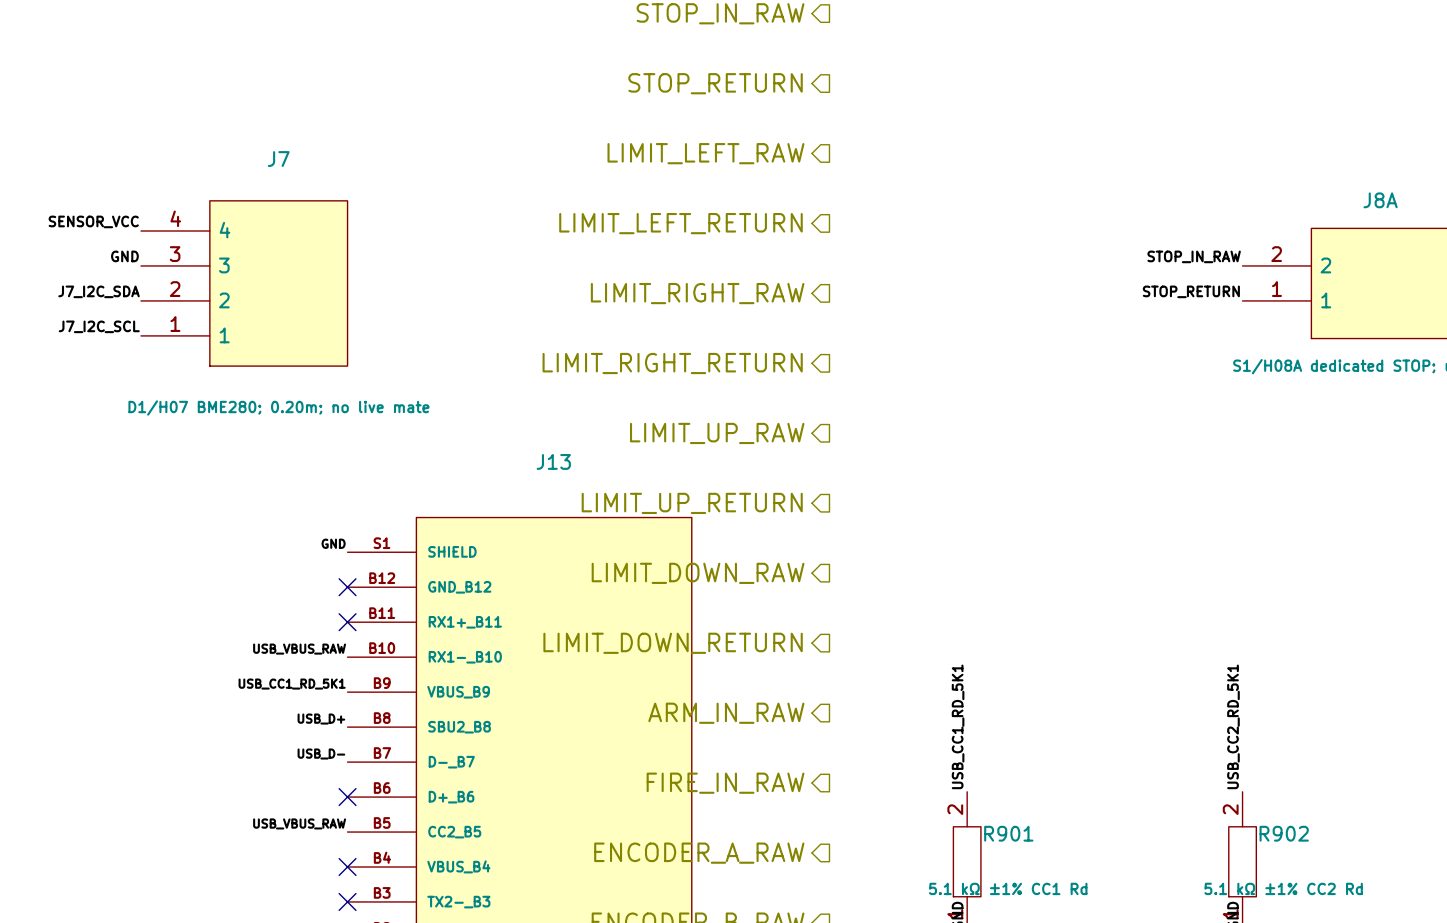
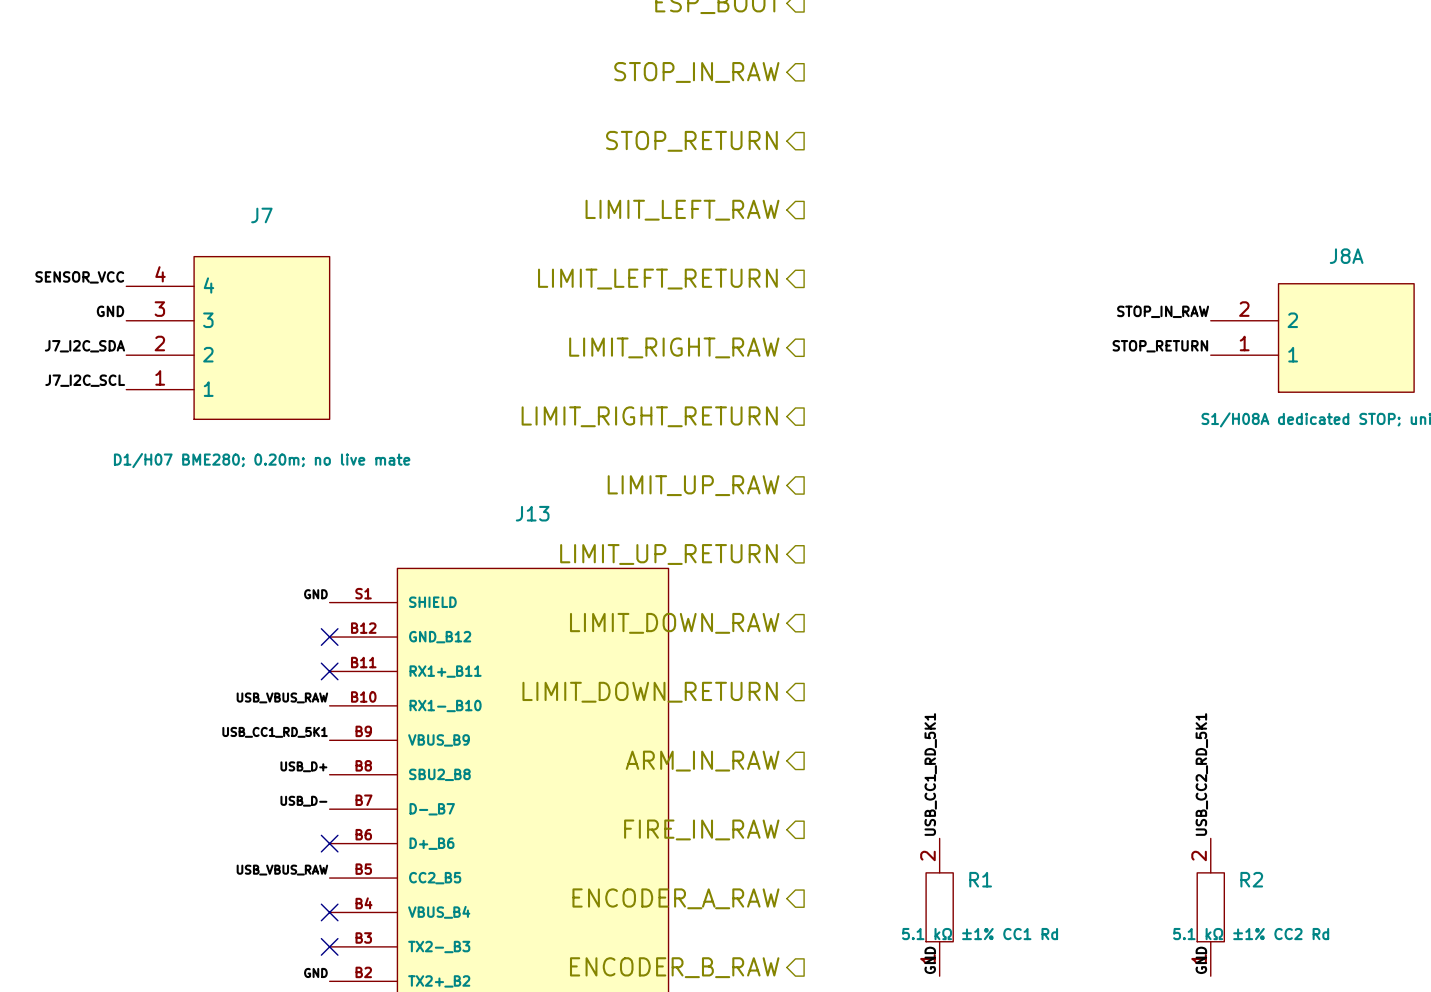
R901 name: R901 (1008, 833) -> R1 (980, 879)
R902 name: R902 (1284, 833) -> R2 (1251, 879)

